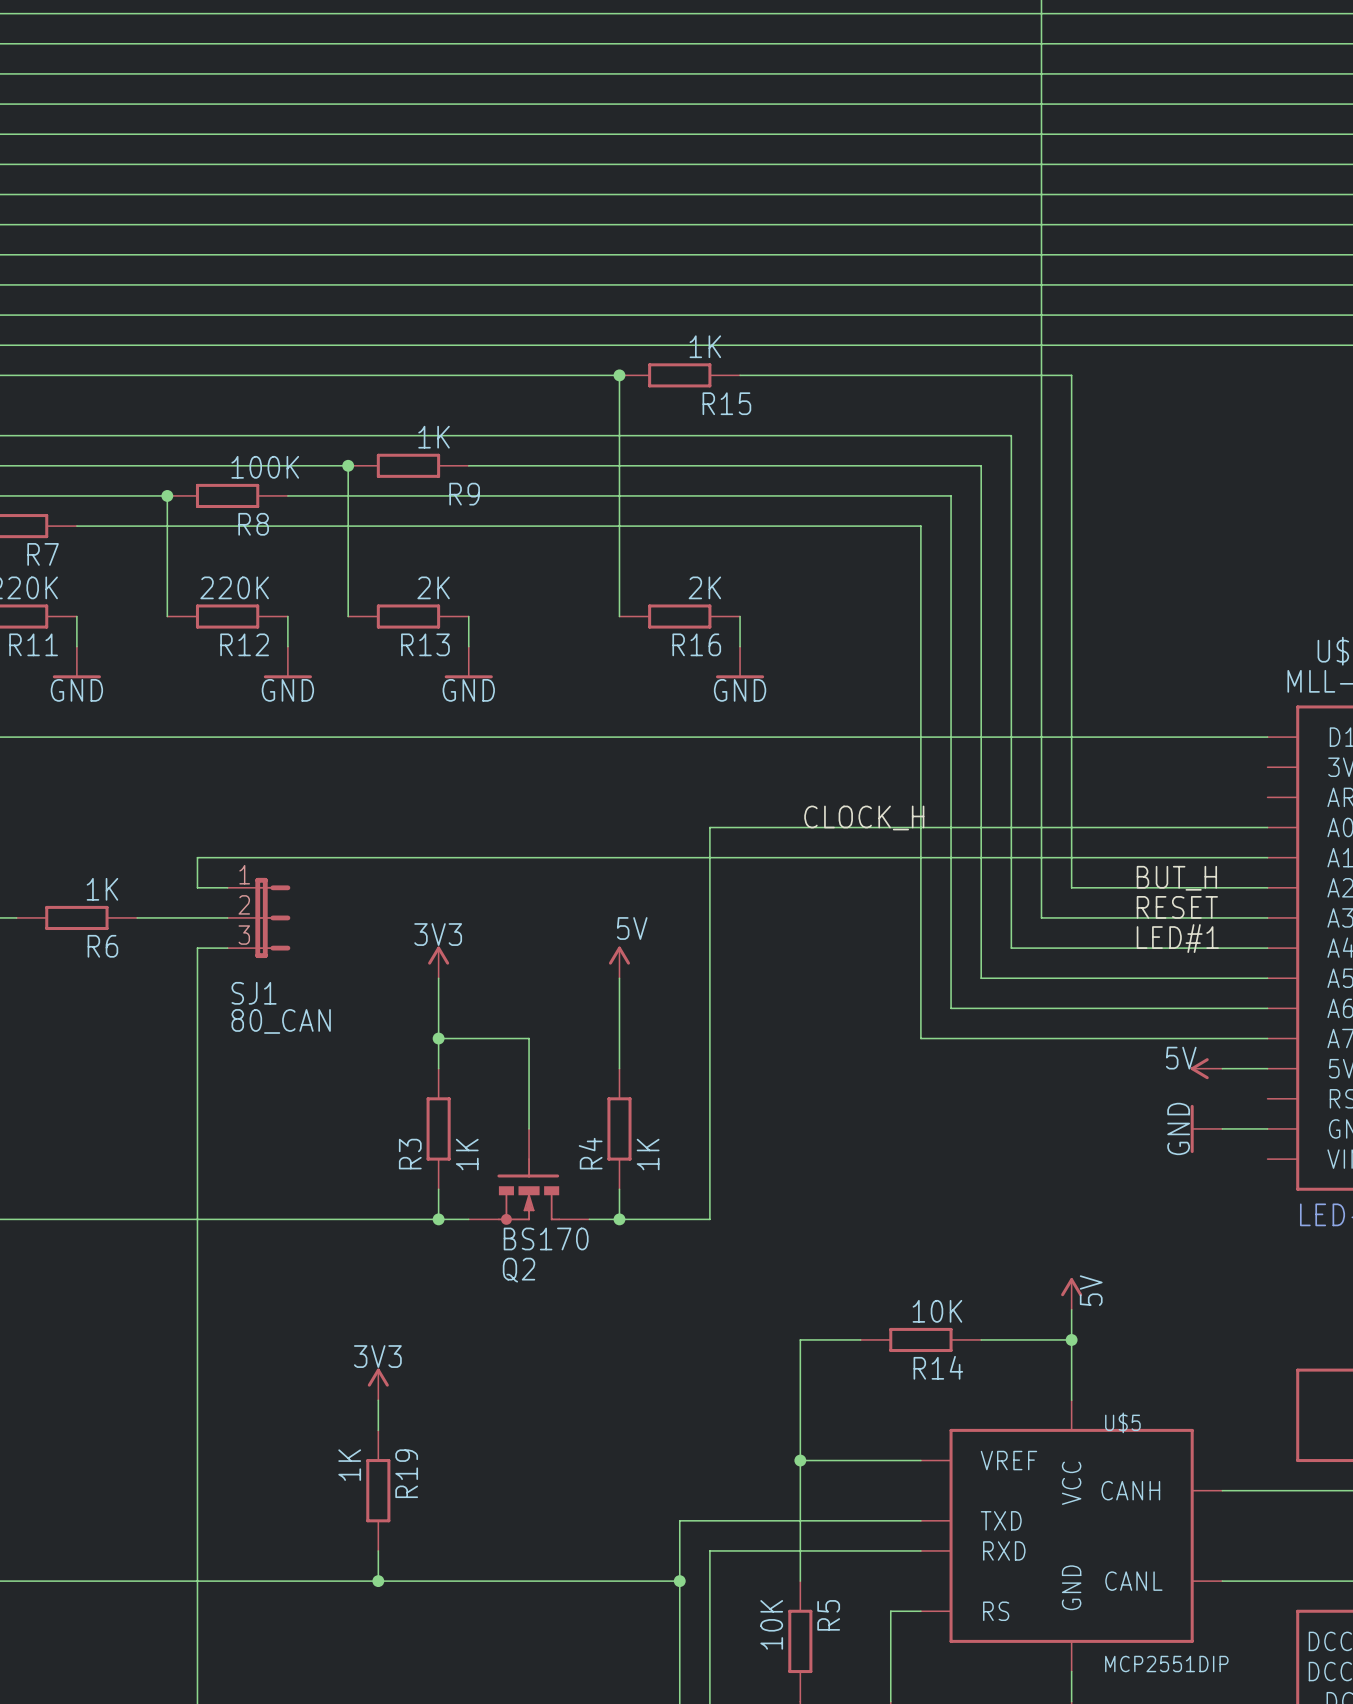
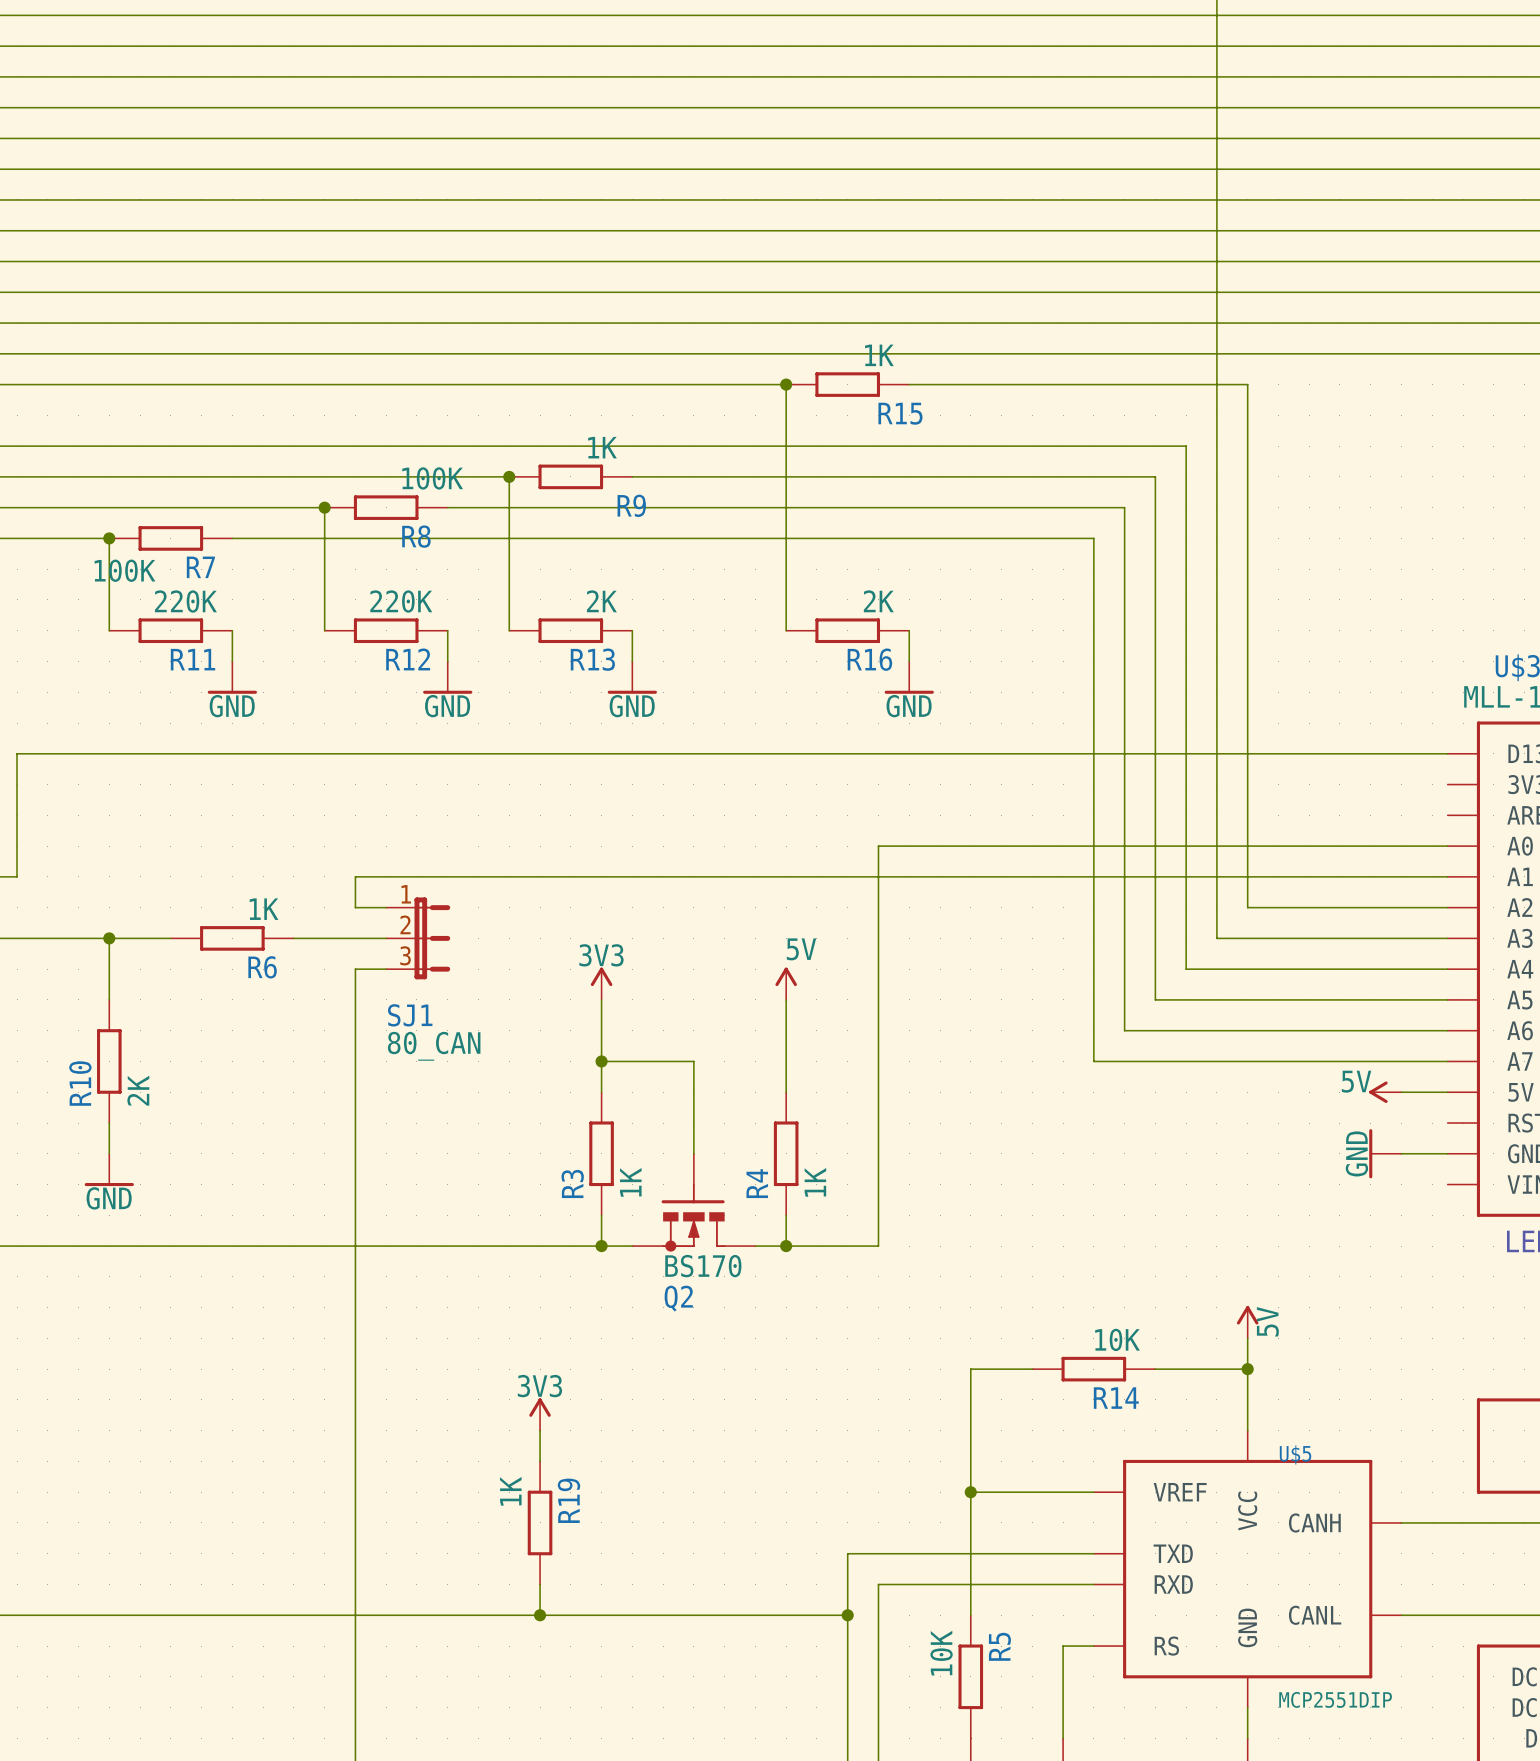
label: CLOCK_H (864, 817) -> none
label: BUT_H (1176, 878) -> none
label: RESET (1177, 907) -> none
label: LED#1 (1177, 938) -> none

